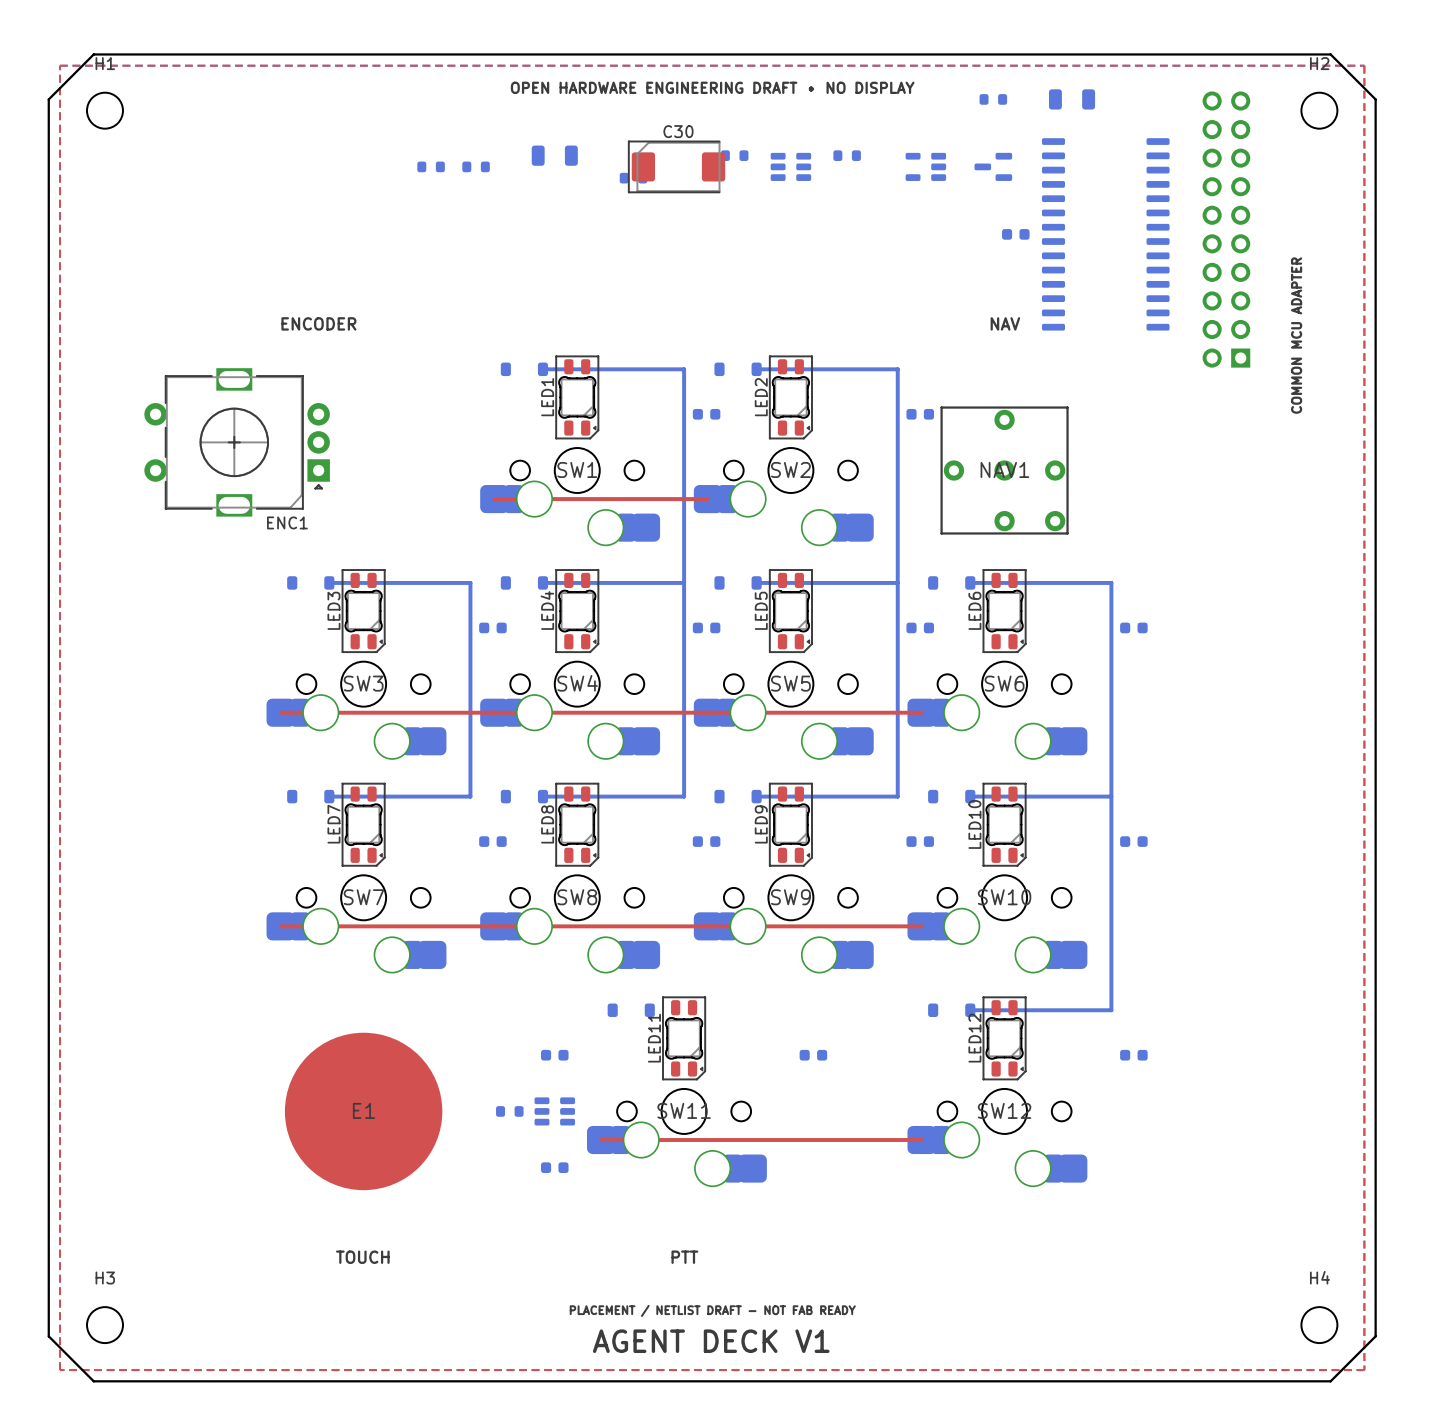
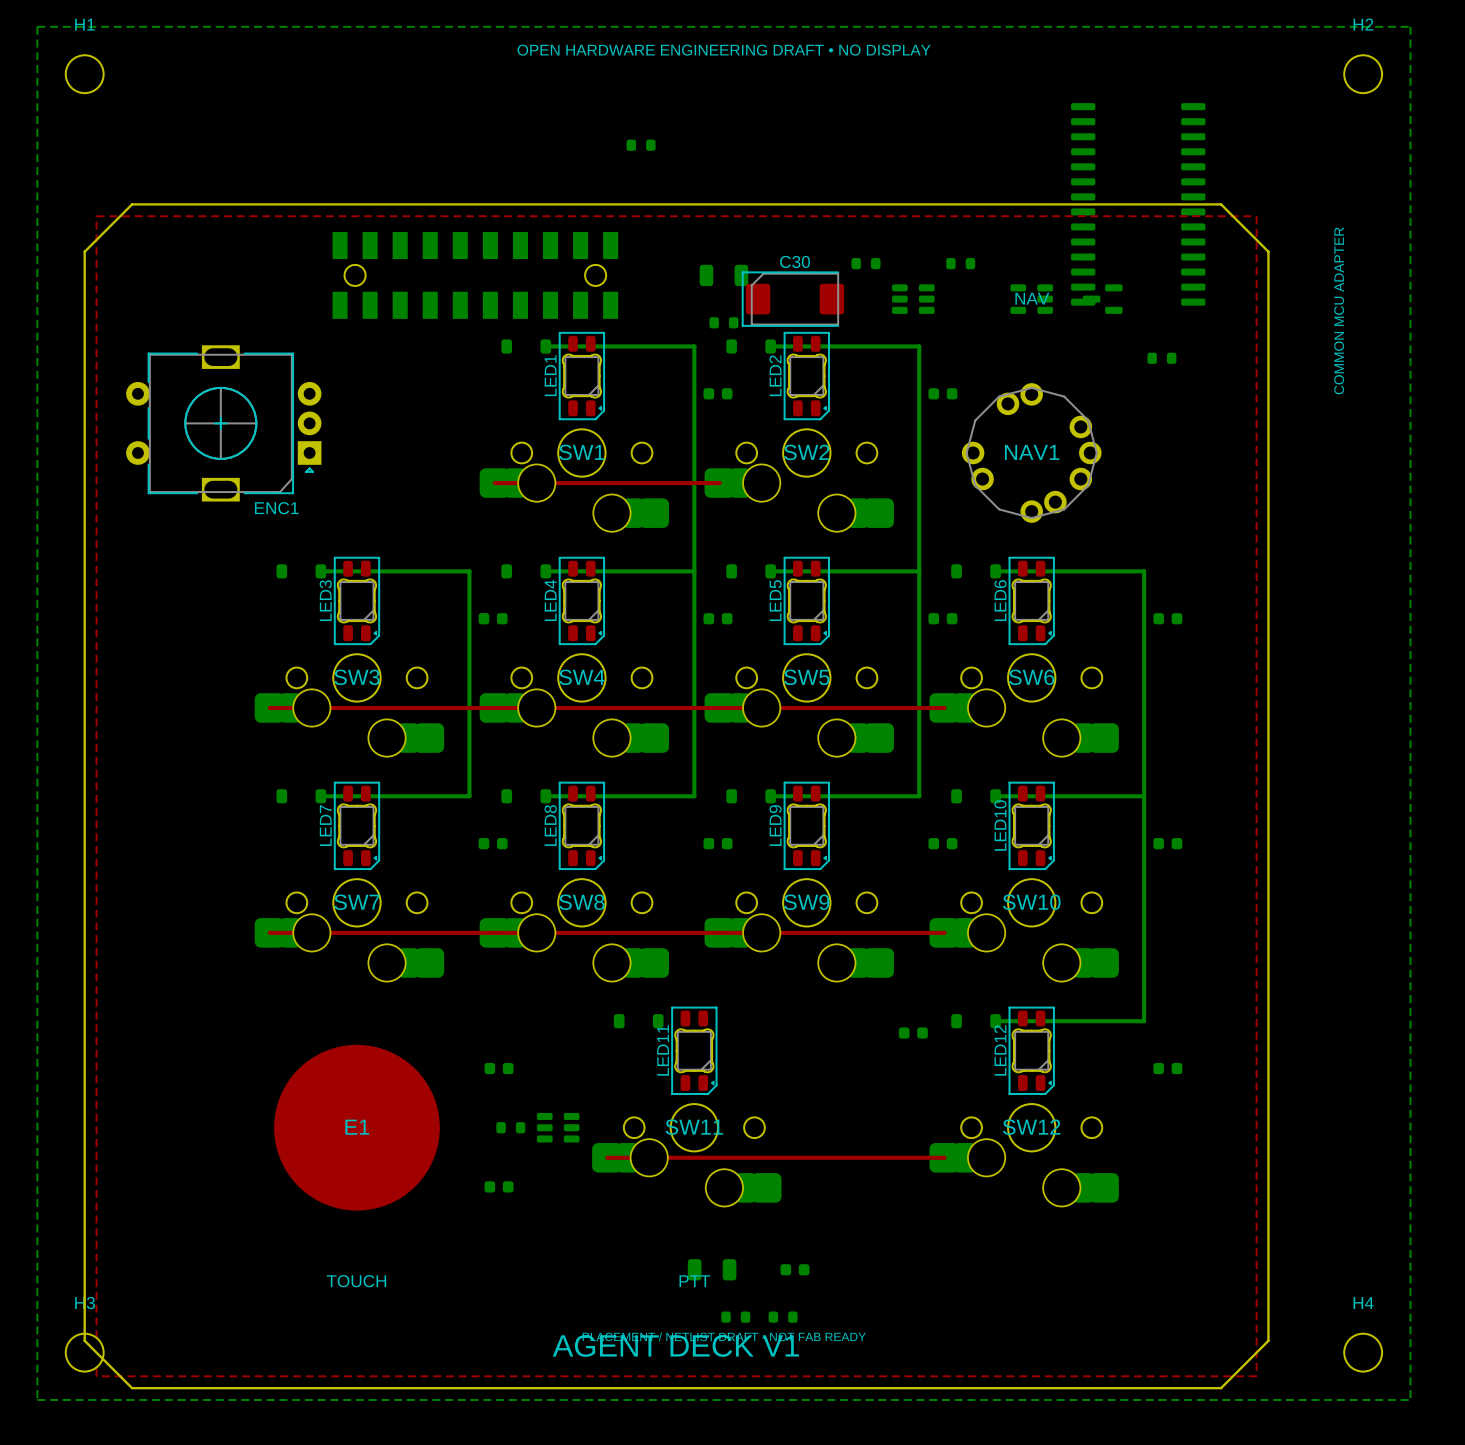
board edge: (93, 54) (48, 99) (48, 1336) (93, 1381) (1330, 1381) (1375, 1336) (1375, 99) (1330, 54) (93, 54) -> (132, 204) (84, 251) (84, 1340) (132, 1388) (1221, 1388) (1268, 1340) (1268, 251) (1221, 204) (132, 204)
top zone outline: (60, 65) (1364, 65) (1364, 1370) (60, 1370) (60, 65) -> (96, 216) (96, 1376) (1256, 1376) (1256, 216) (96, 216)
part: (993, 99) -> none
part: (1072, 99) -> none
part: (554, 155) -> none
part: (734, 155) -> none
part: (847, 155) -> none
part: (431, 166) -> none
part: (476, 166) -> none
C30 position: (676, 166) -> (793, 299)
part position: (790, 166) -> (913, 299)
part position: (925, 166) -> (1031, 299)
part position: (993, 166) -> (1102, 299)
part: (1226, 229) -> none
part: (1015, 234) -> none
part: none -> (865, 263)
part: none -> (960, 263)
part: none -> (475, 275)
part: none -> (723, 275)
text: ENCODER (318, 323) -> none
part: none -> (723, 322)
part: none -> (1161, 358)
NAV1 footprint: [940, 406, 1069, 535] -> [961, 383, 1102, 523]
part position: (554, 1055) -> (499, 1068)
part position: (813, 1055) -> (913, 1033)
part position: (554, 1167) -> (499, 1186)
part: none -> (712, 1269)
part: none -> (794, 1269)
part: none -> (735, 1317)
part: none -> (783, 1317)
text position: AGENT DECK V1 (711, 1341) -> AGENT DECK V1 (675, 1345)

